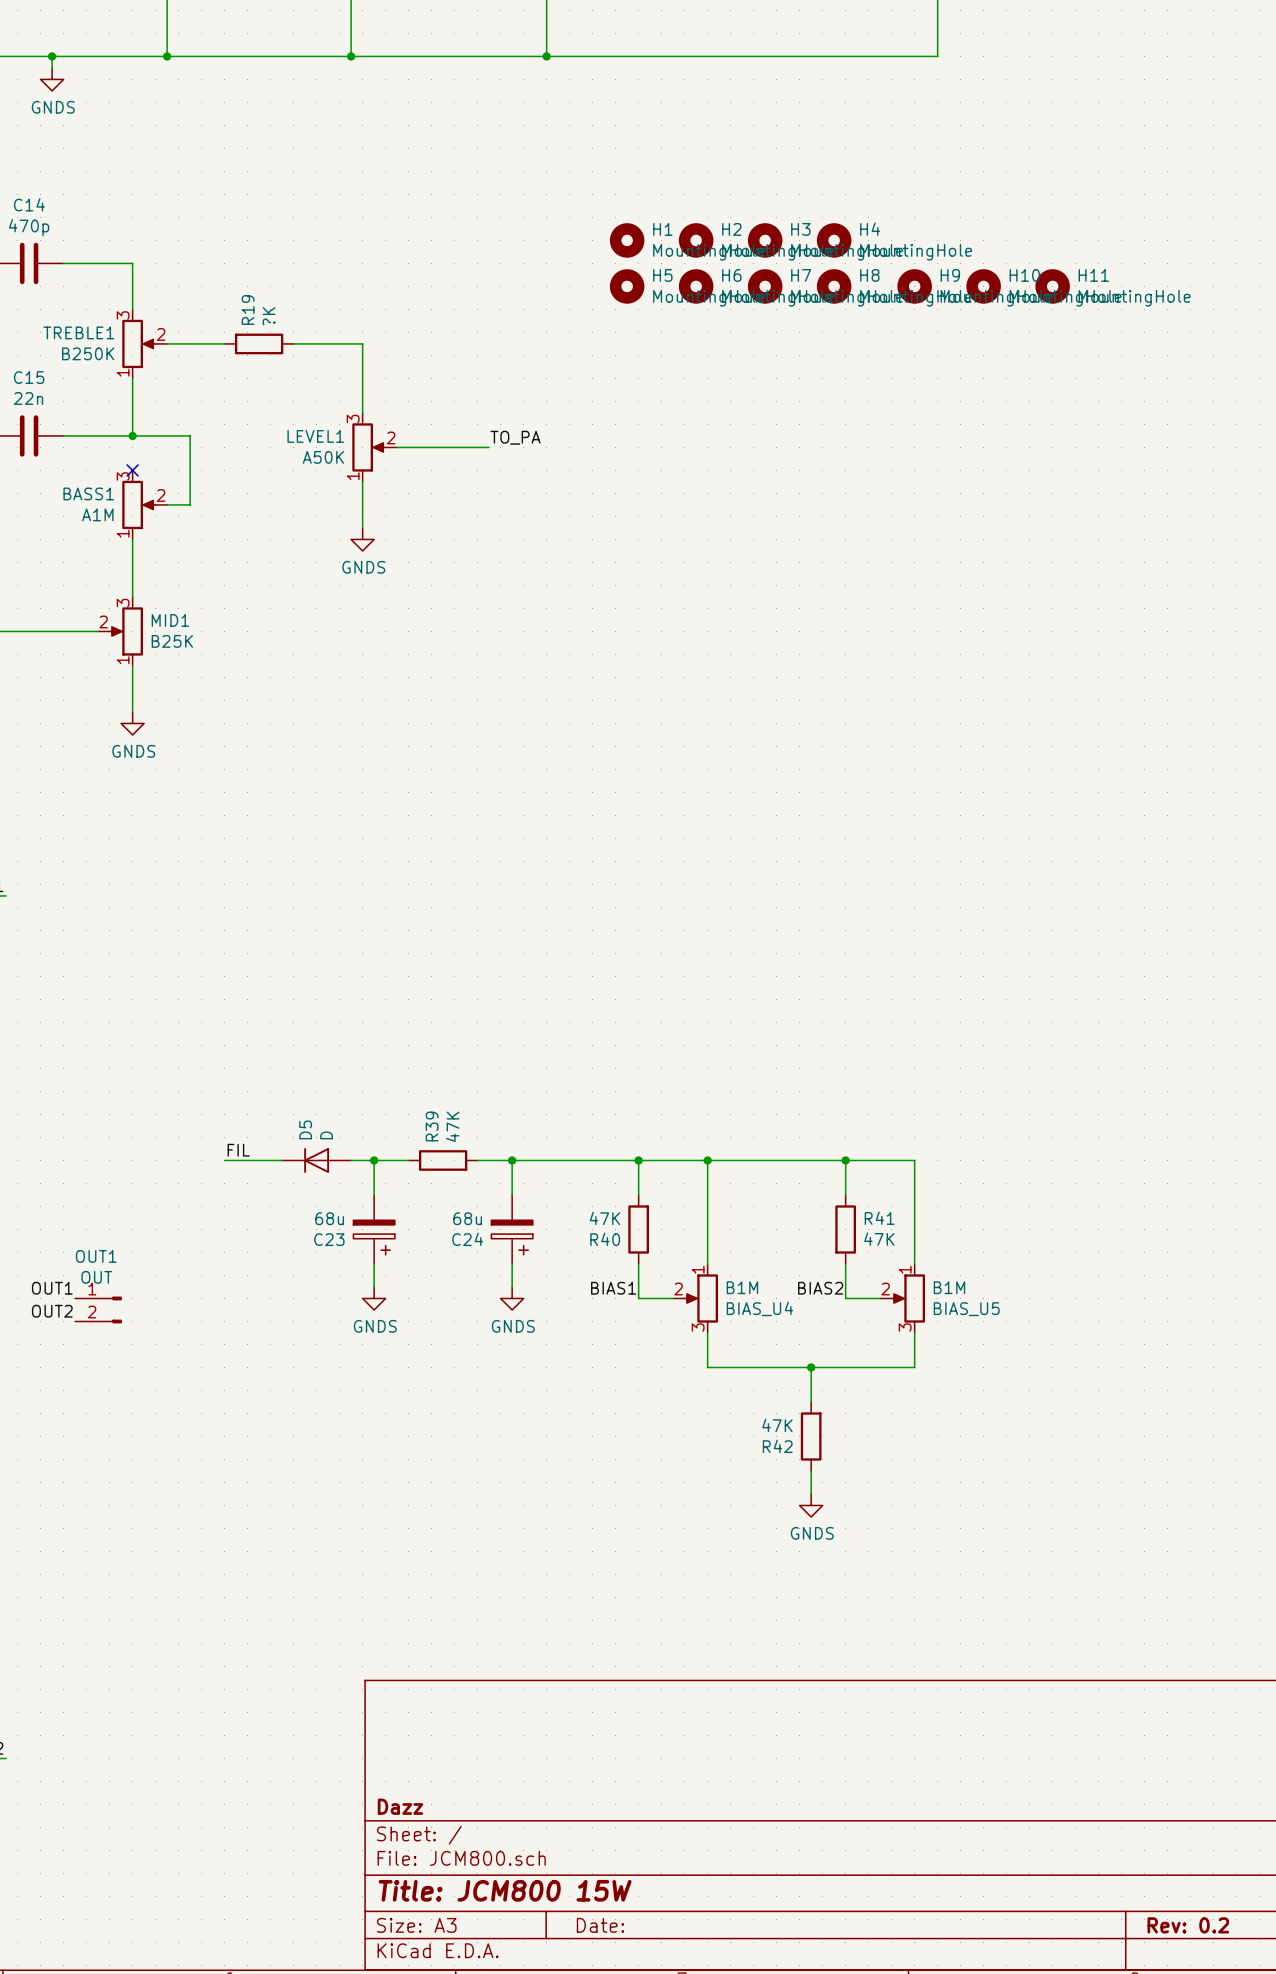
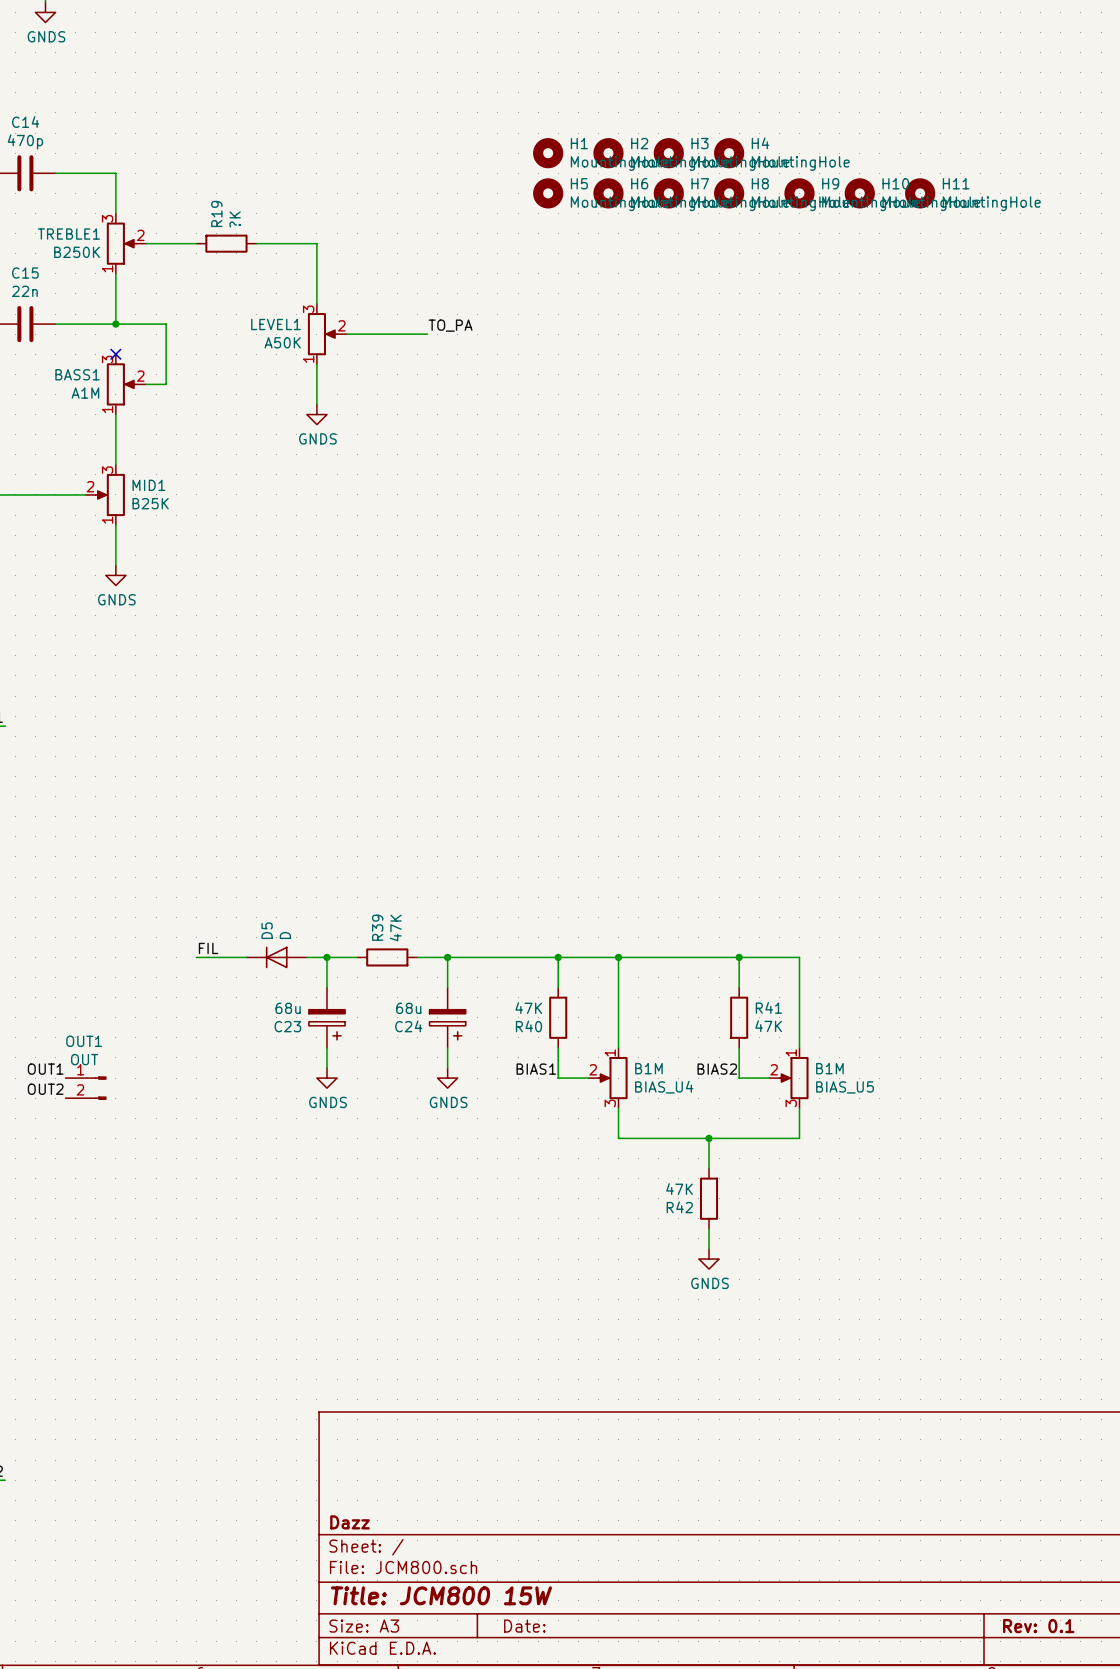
title block: Rev: 0.2 (1188, 1925) -> Rev: 0.1 (1038, 1626)

